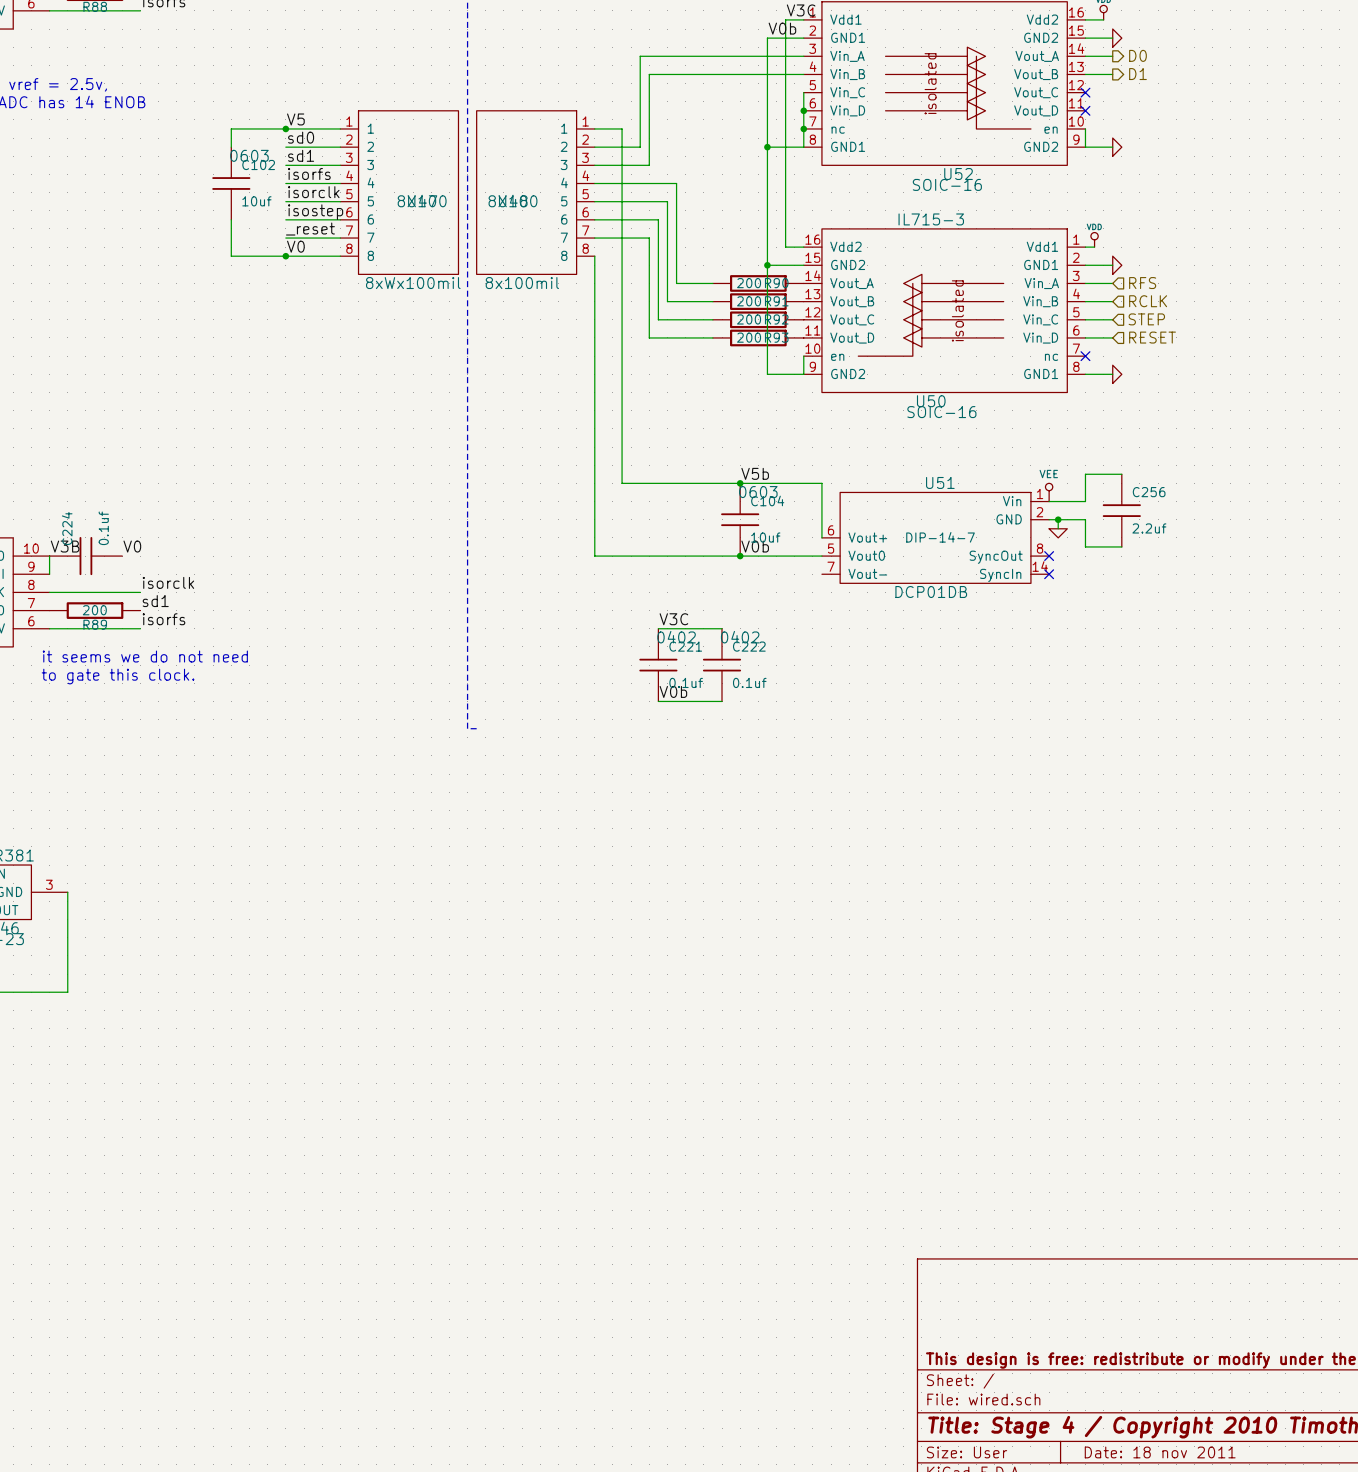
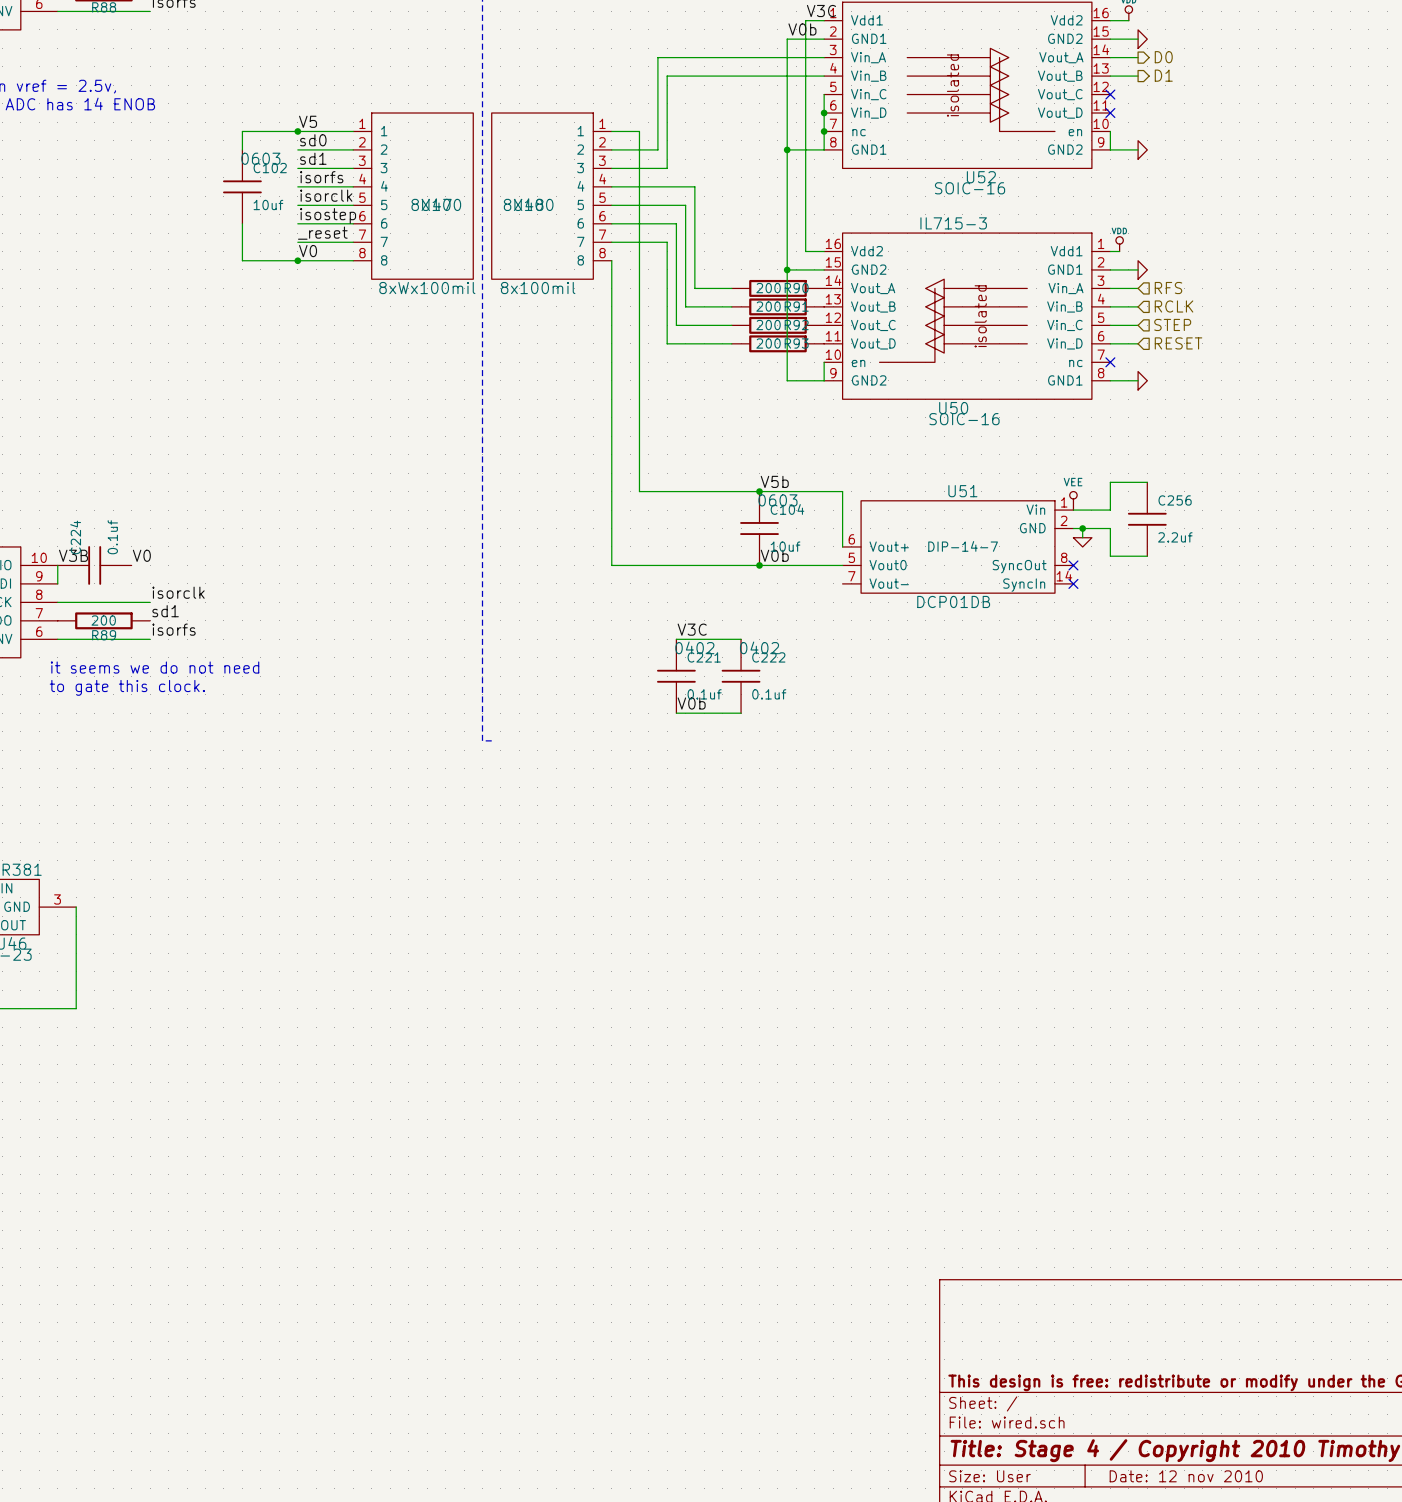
title block: Date: 18 nov 2011 (1160, 1452) -> Date: 12 nov 2010 (1186, 1476)

